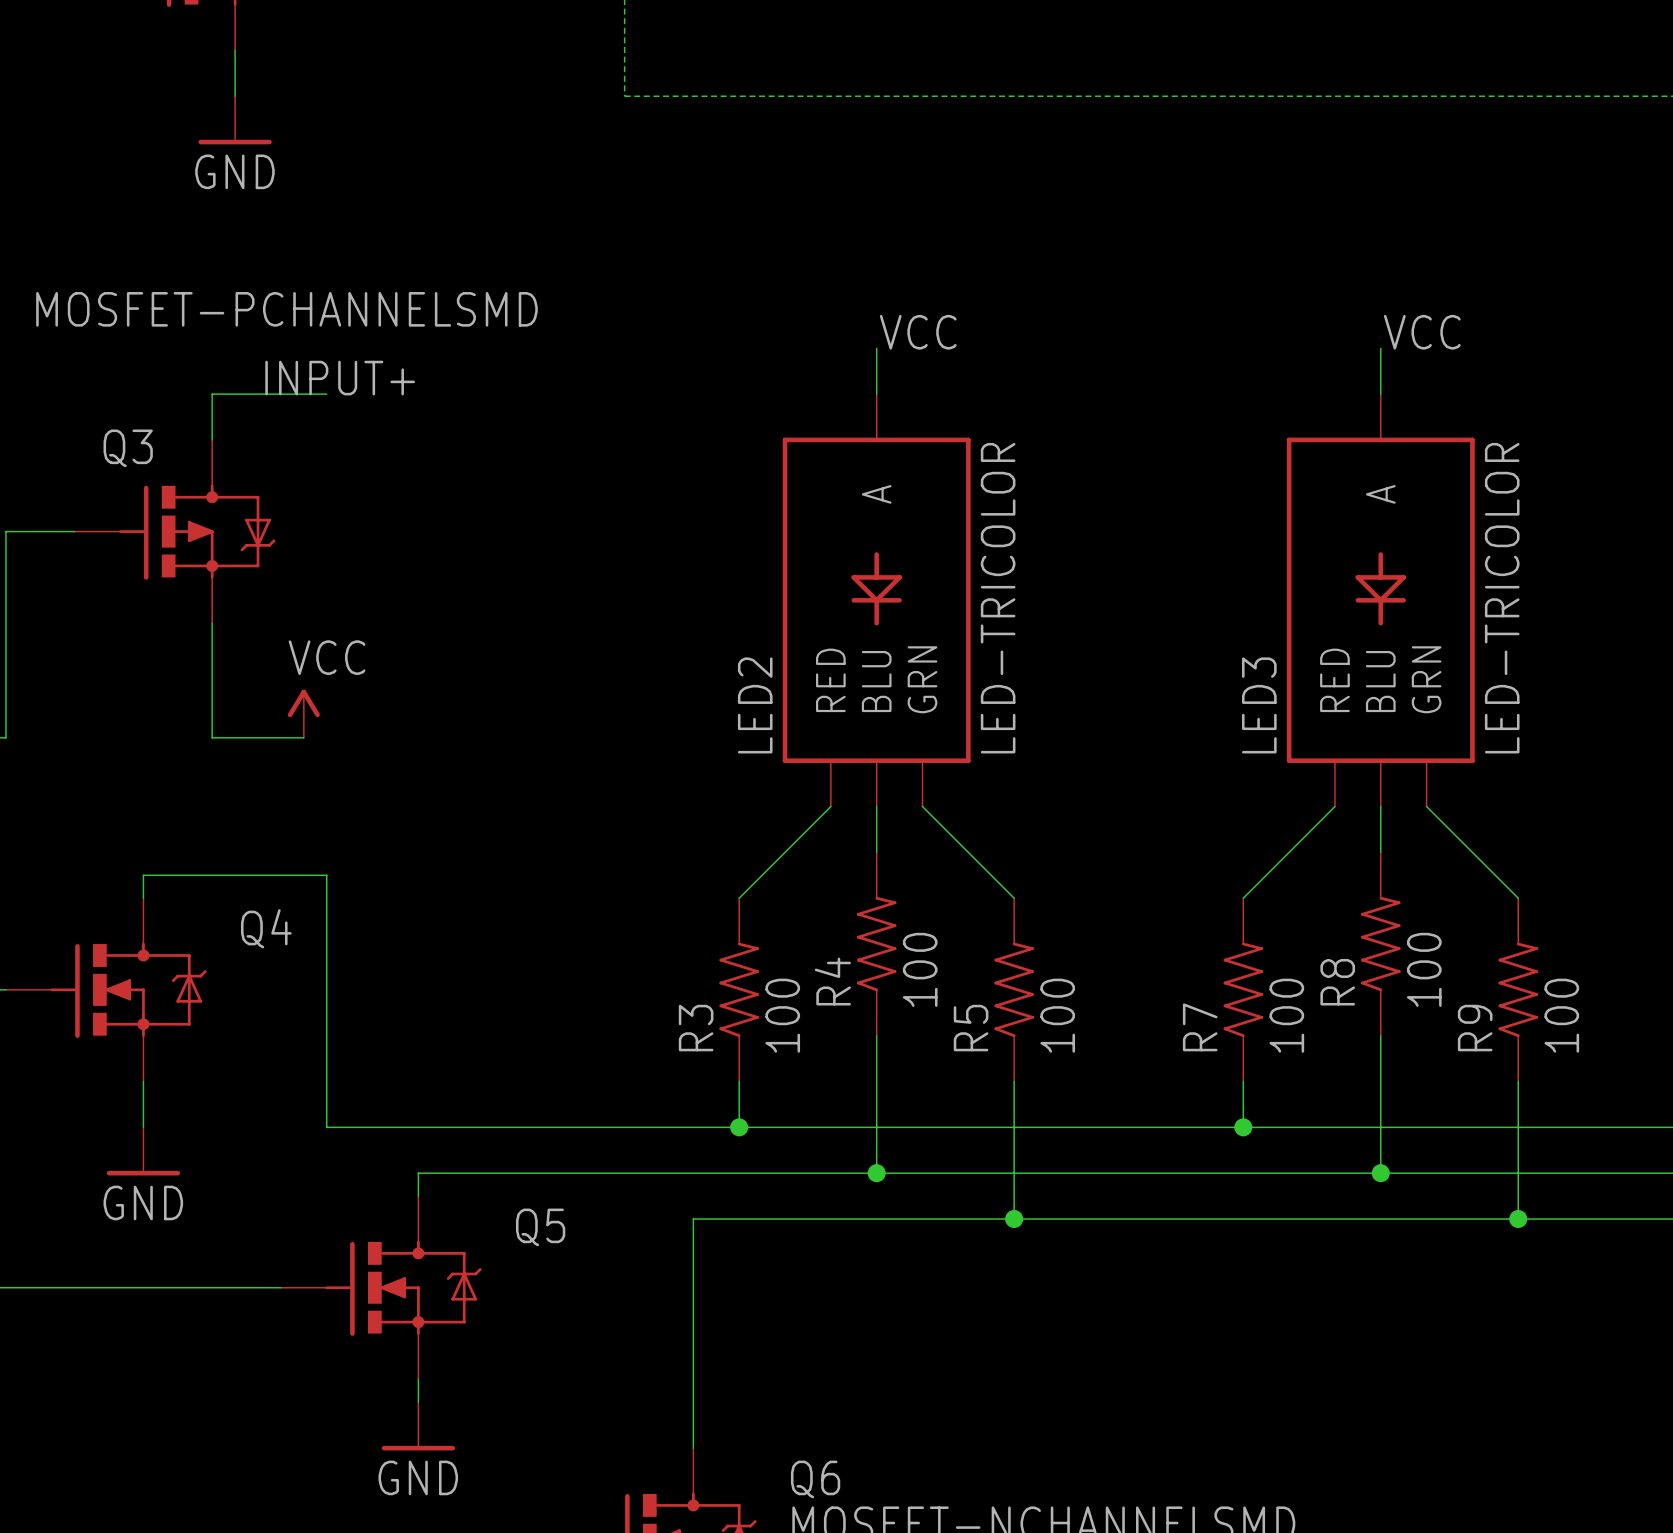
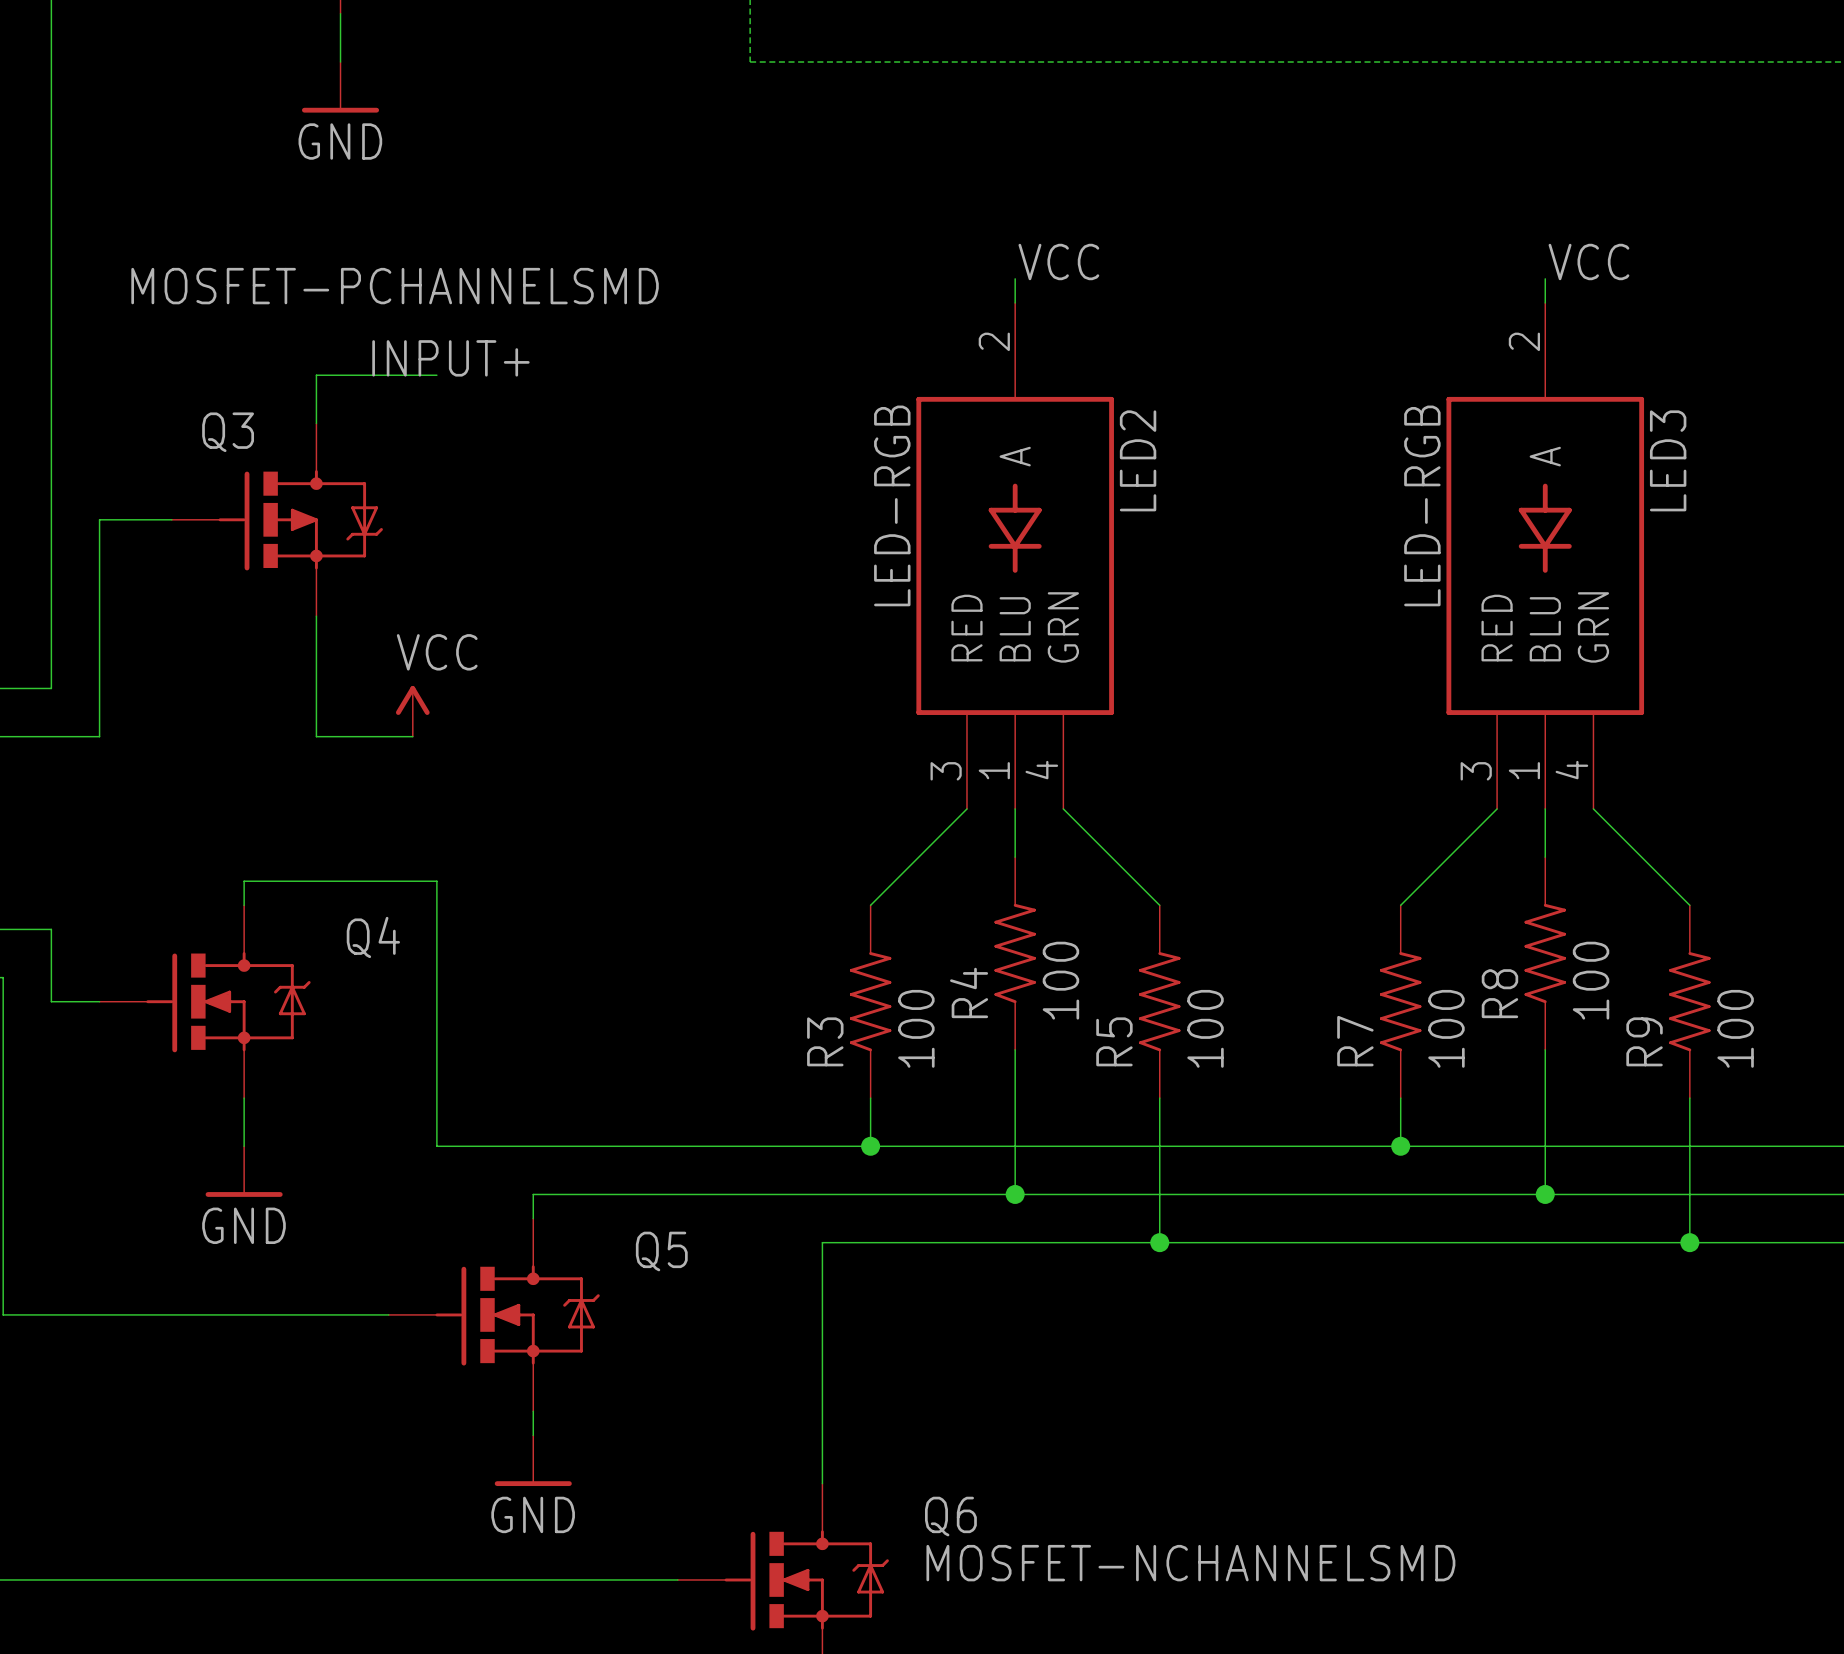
wire: none -> (1015, 278) (1015, 302)
wire: none -> (1545, 278) (1545, 302)
label position: VCC (918, 332) -> VCC (1058, 261)
label position: VCC (1422, 332) -> VCC (1588, 261)
LED2 symbol: [782, 394, 971, 807] -> [916, 302, 1114, 809]
LED3 symbol: [1286, 394, 1475, 807] -> [1446, 302, 1645, 809]
LED2 value: LED-TRICOLOR (998, 598) -> LED-RGB (892, 505)
LED3 value: LED-TRICOLOR (1502, 598) -> LED-RGB (1422, 505)
LED2 name position: LED2 (755, 705) -> LED2 (1138, 460)
LED3 name position: LED3 (1259, 705) -> LED3 (1668, 460)

